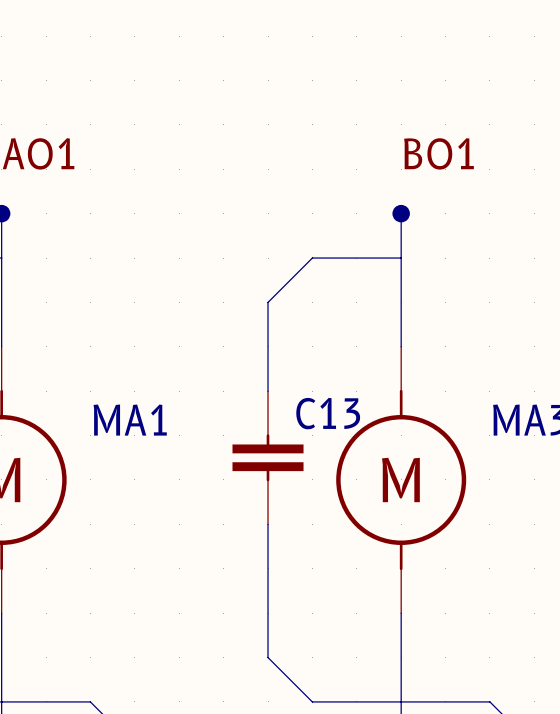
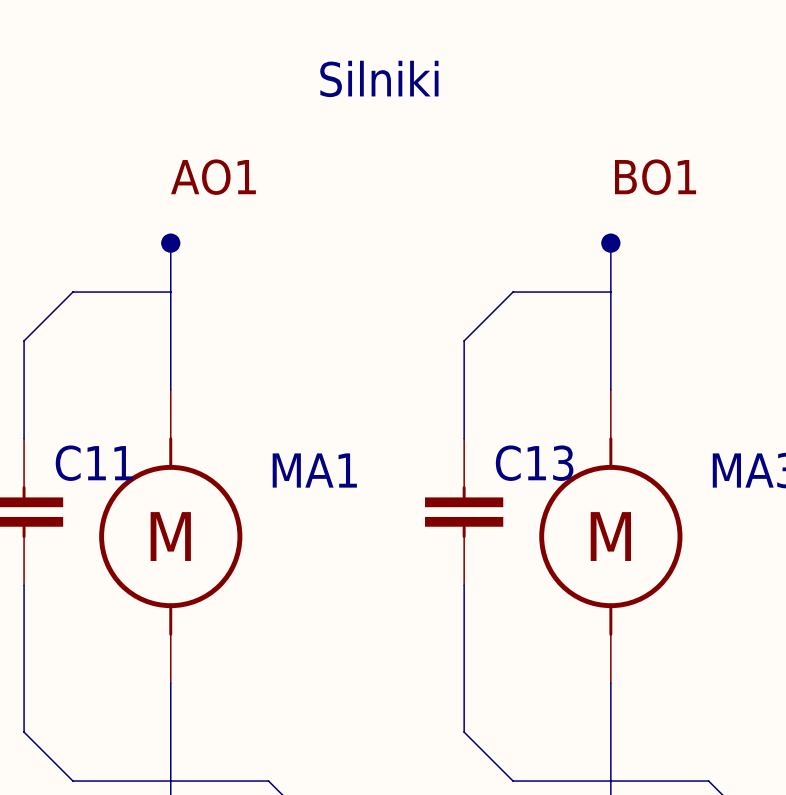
text: none -> Silniki (379, 78)

